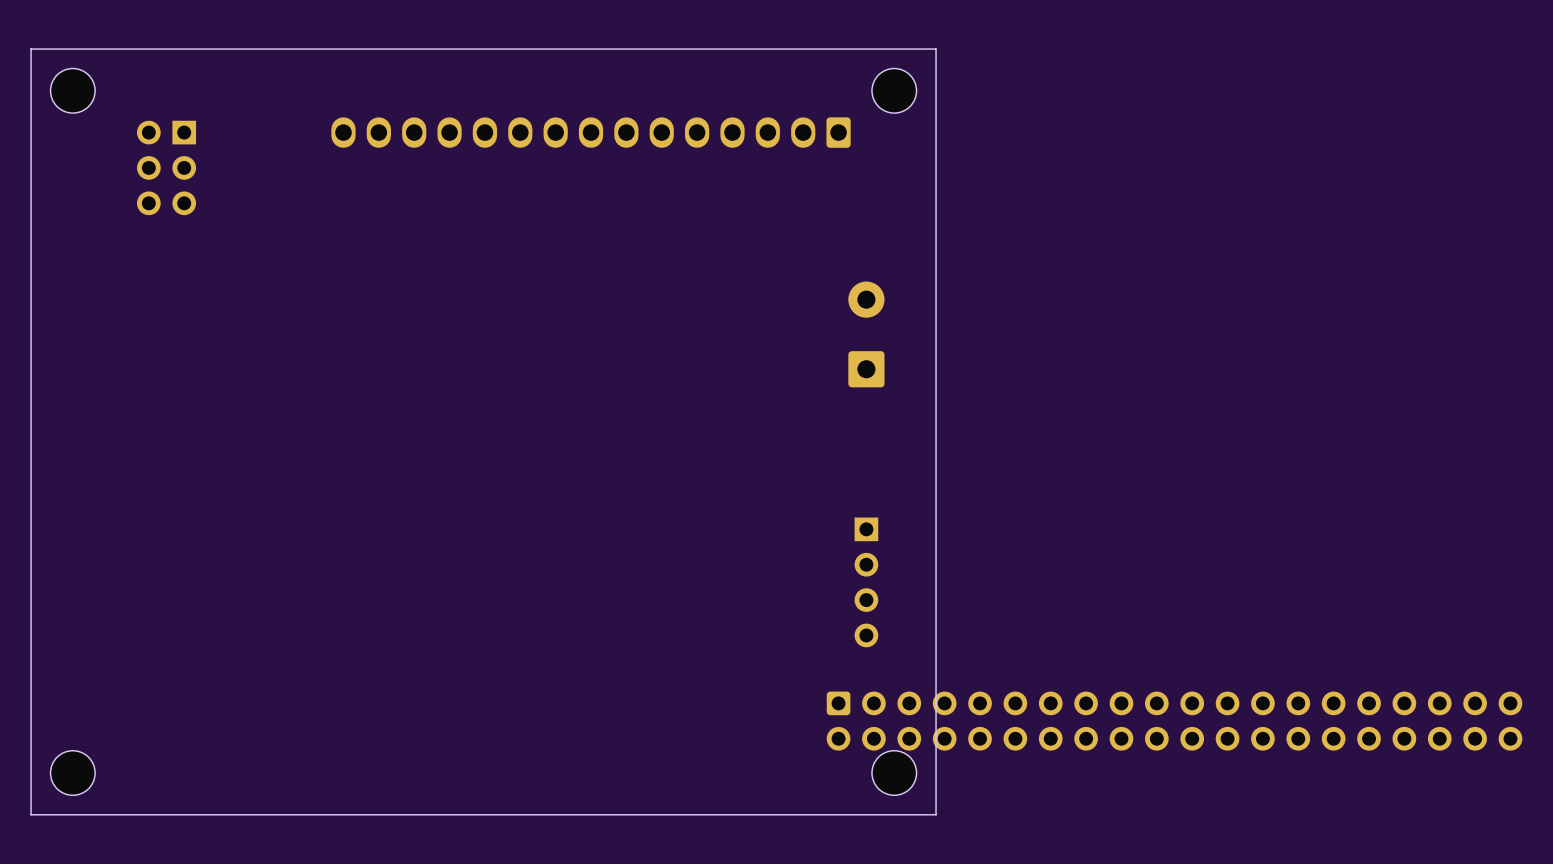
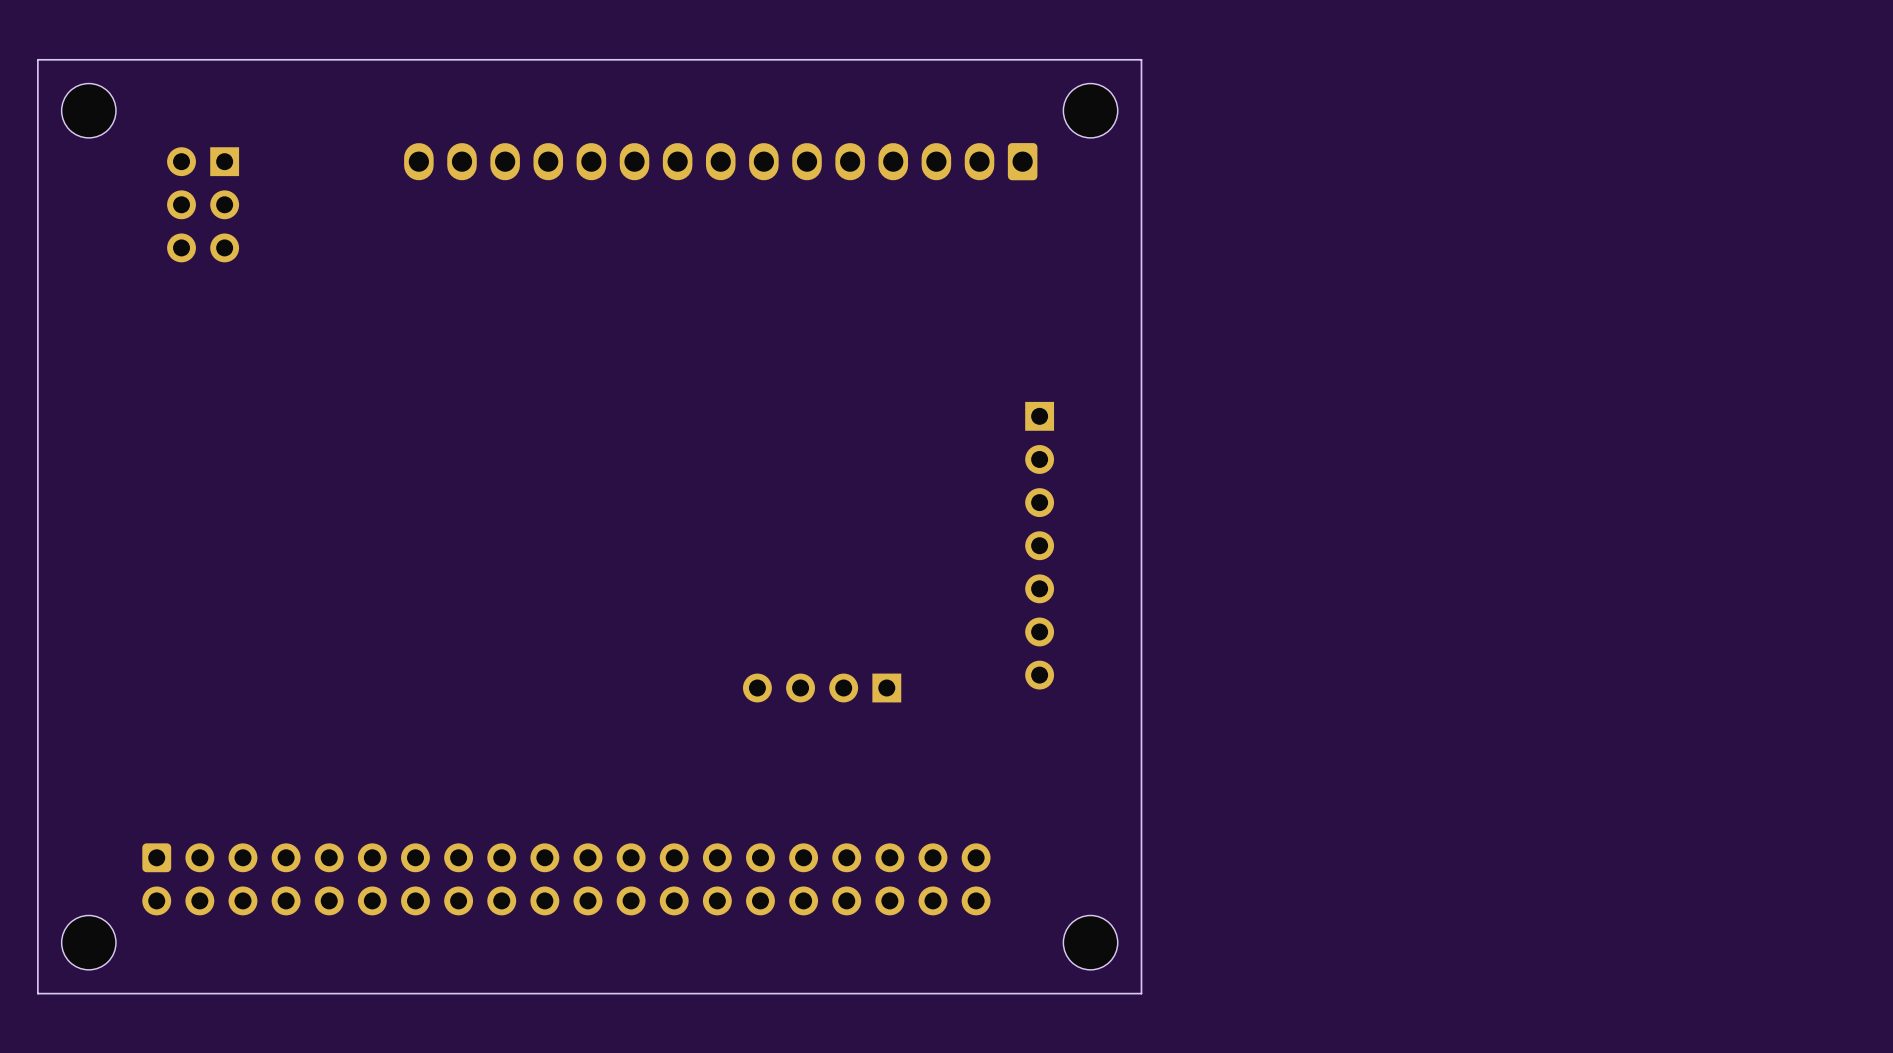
part: (866, 334) -> none
part: none -> (1039, 545)
part rotation: 0° (866, 582) -> 90° clockwise (822, 688)
part position: (866, 582) -> (822, 688)
part: none -> (566, 879)
part: (1174, 721) -> none

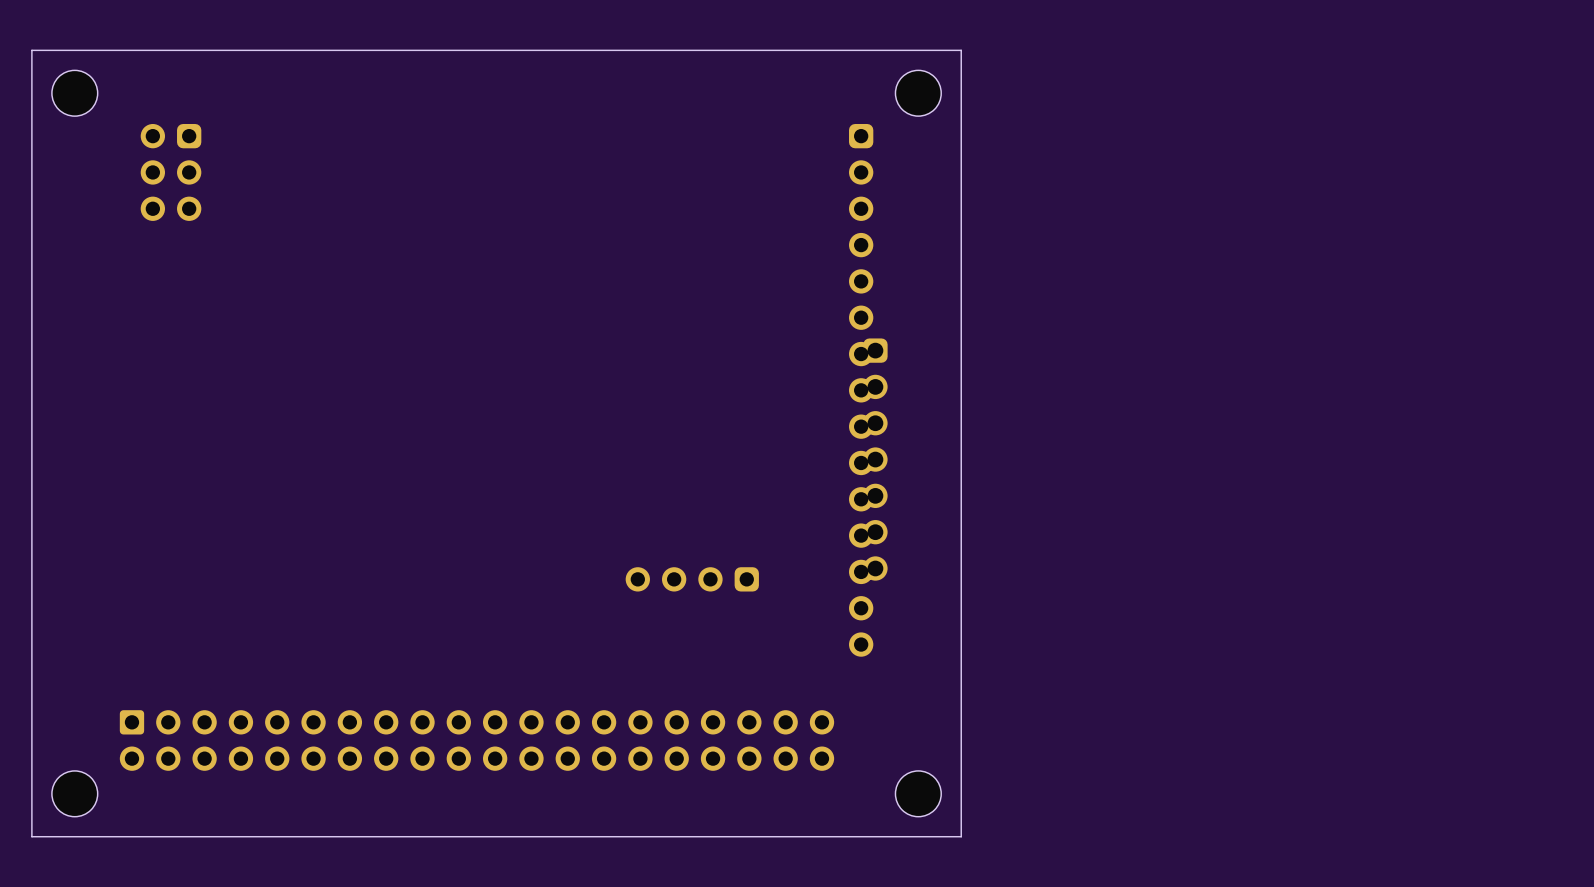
part footprint: [167, 147, 240, 263] -> [140, 123, 202, 221]
part: (720, 161) -> none
part footprint: [1025, 401, 1055, 690] -> [863, 338, 888, 581]
part: none -> (861, 390)
part footprint: [743, 673, 902, 703] -> [625, 567, 759, 592]

